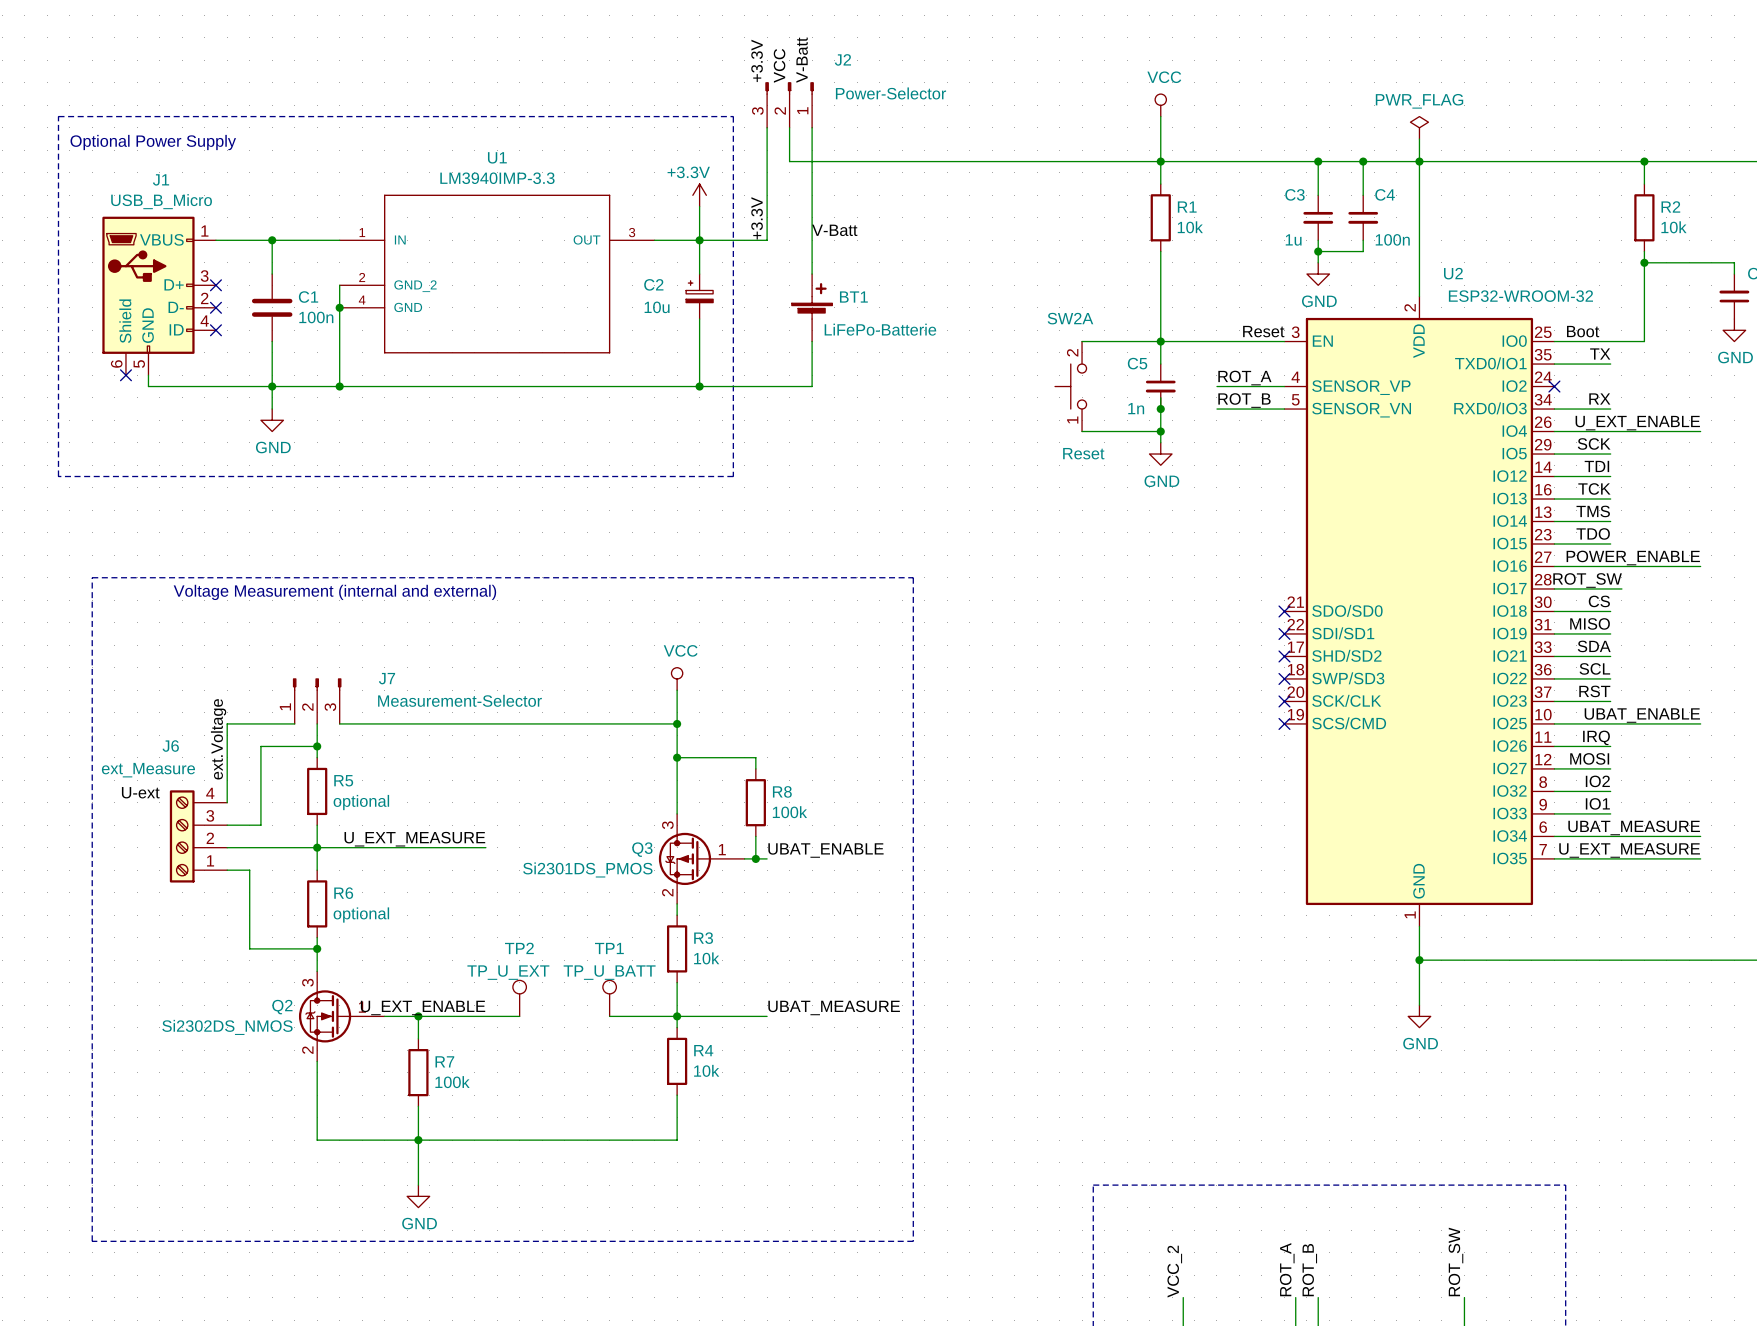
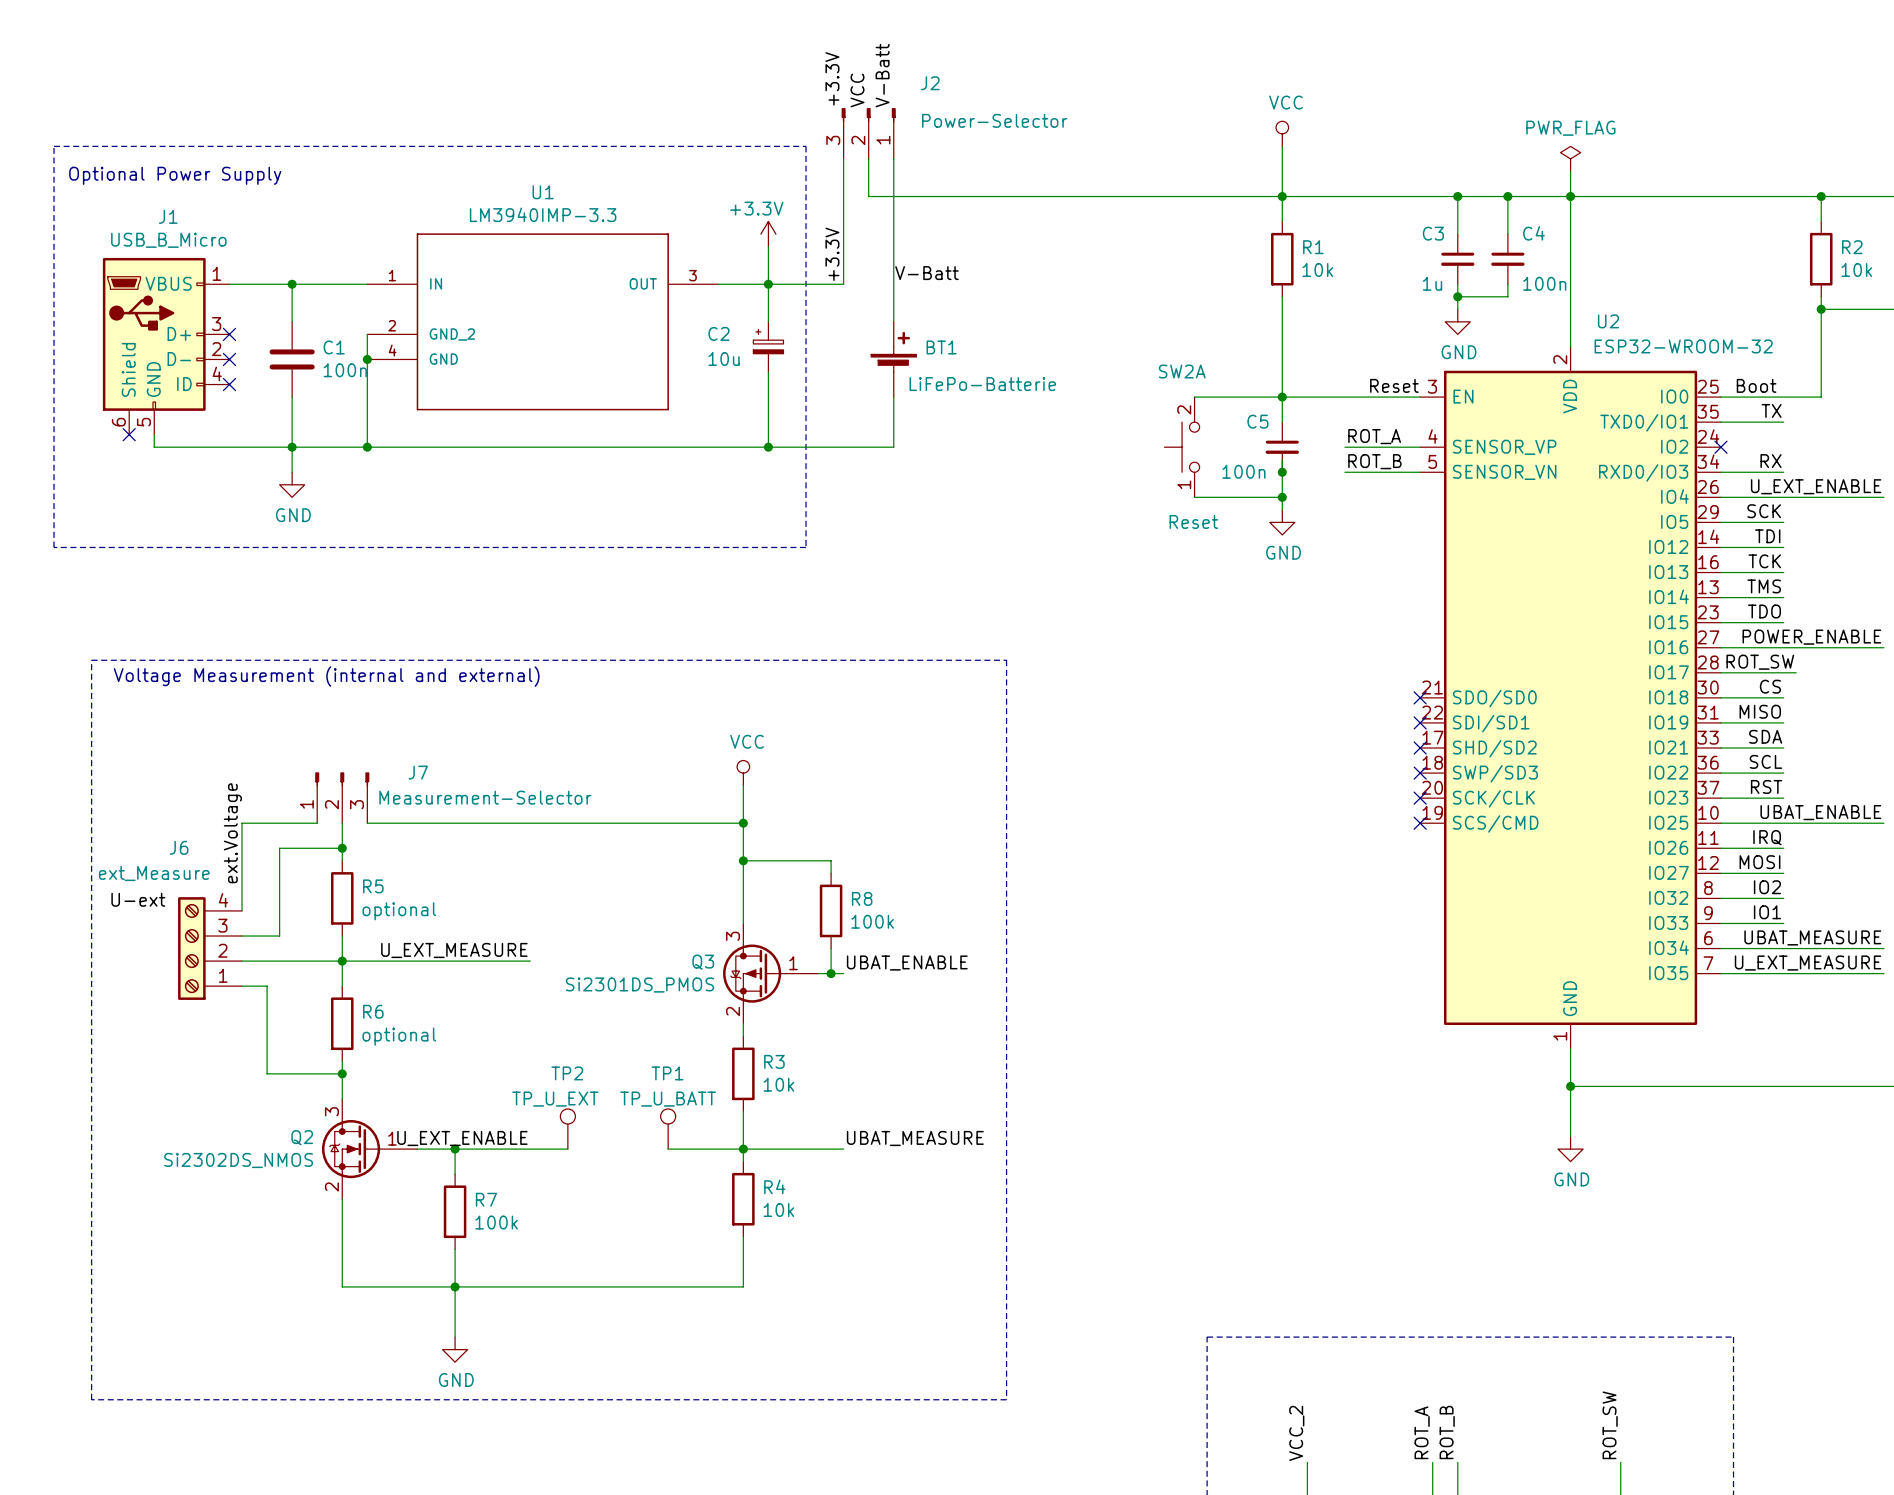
C5 value: 1n (1136, 408) -> 100n (1243, 471)

